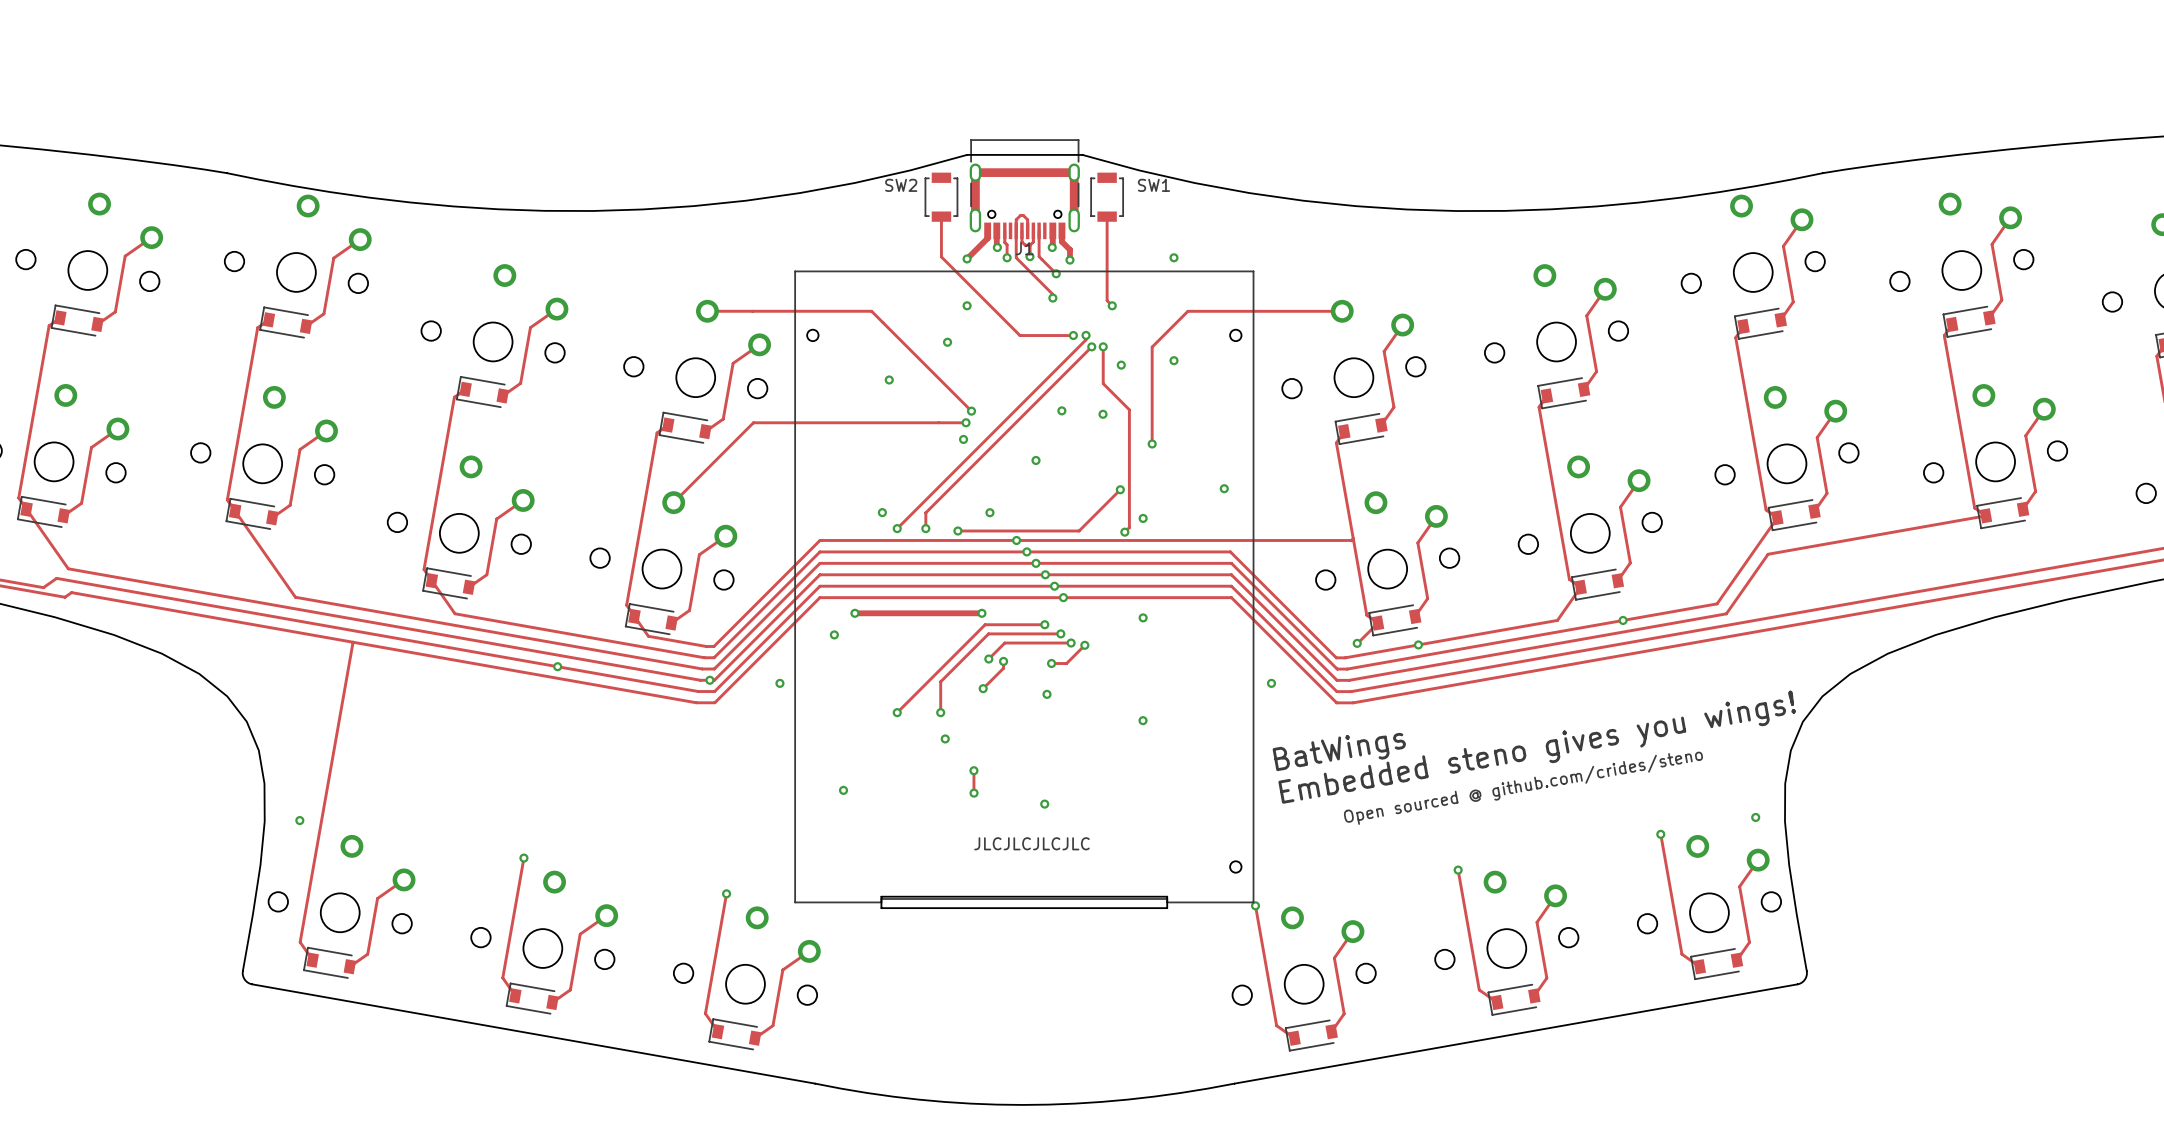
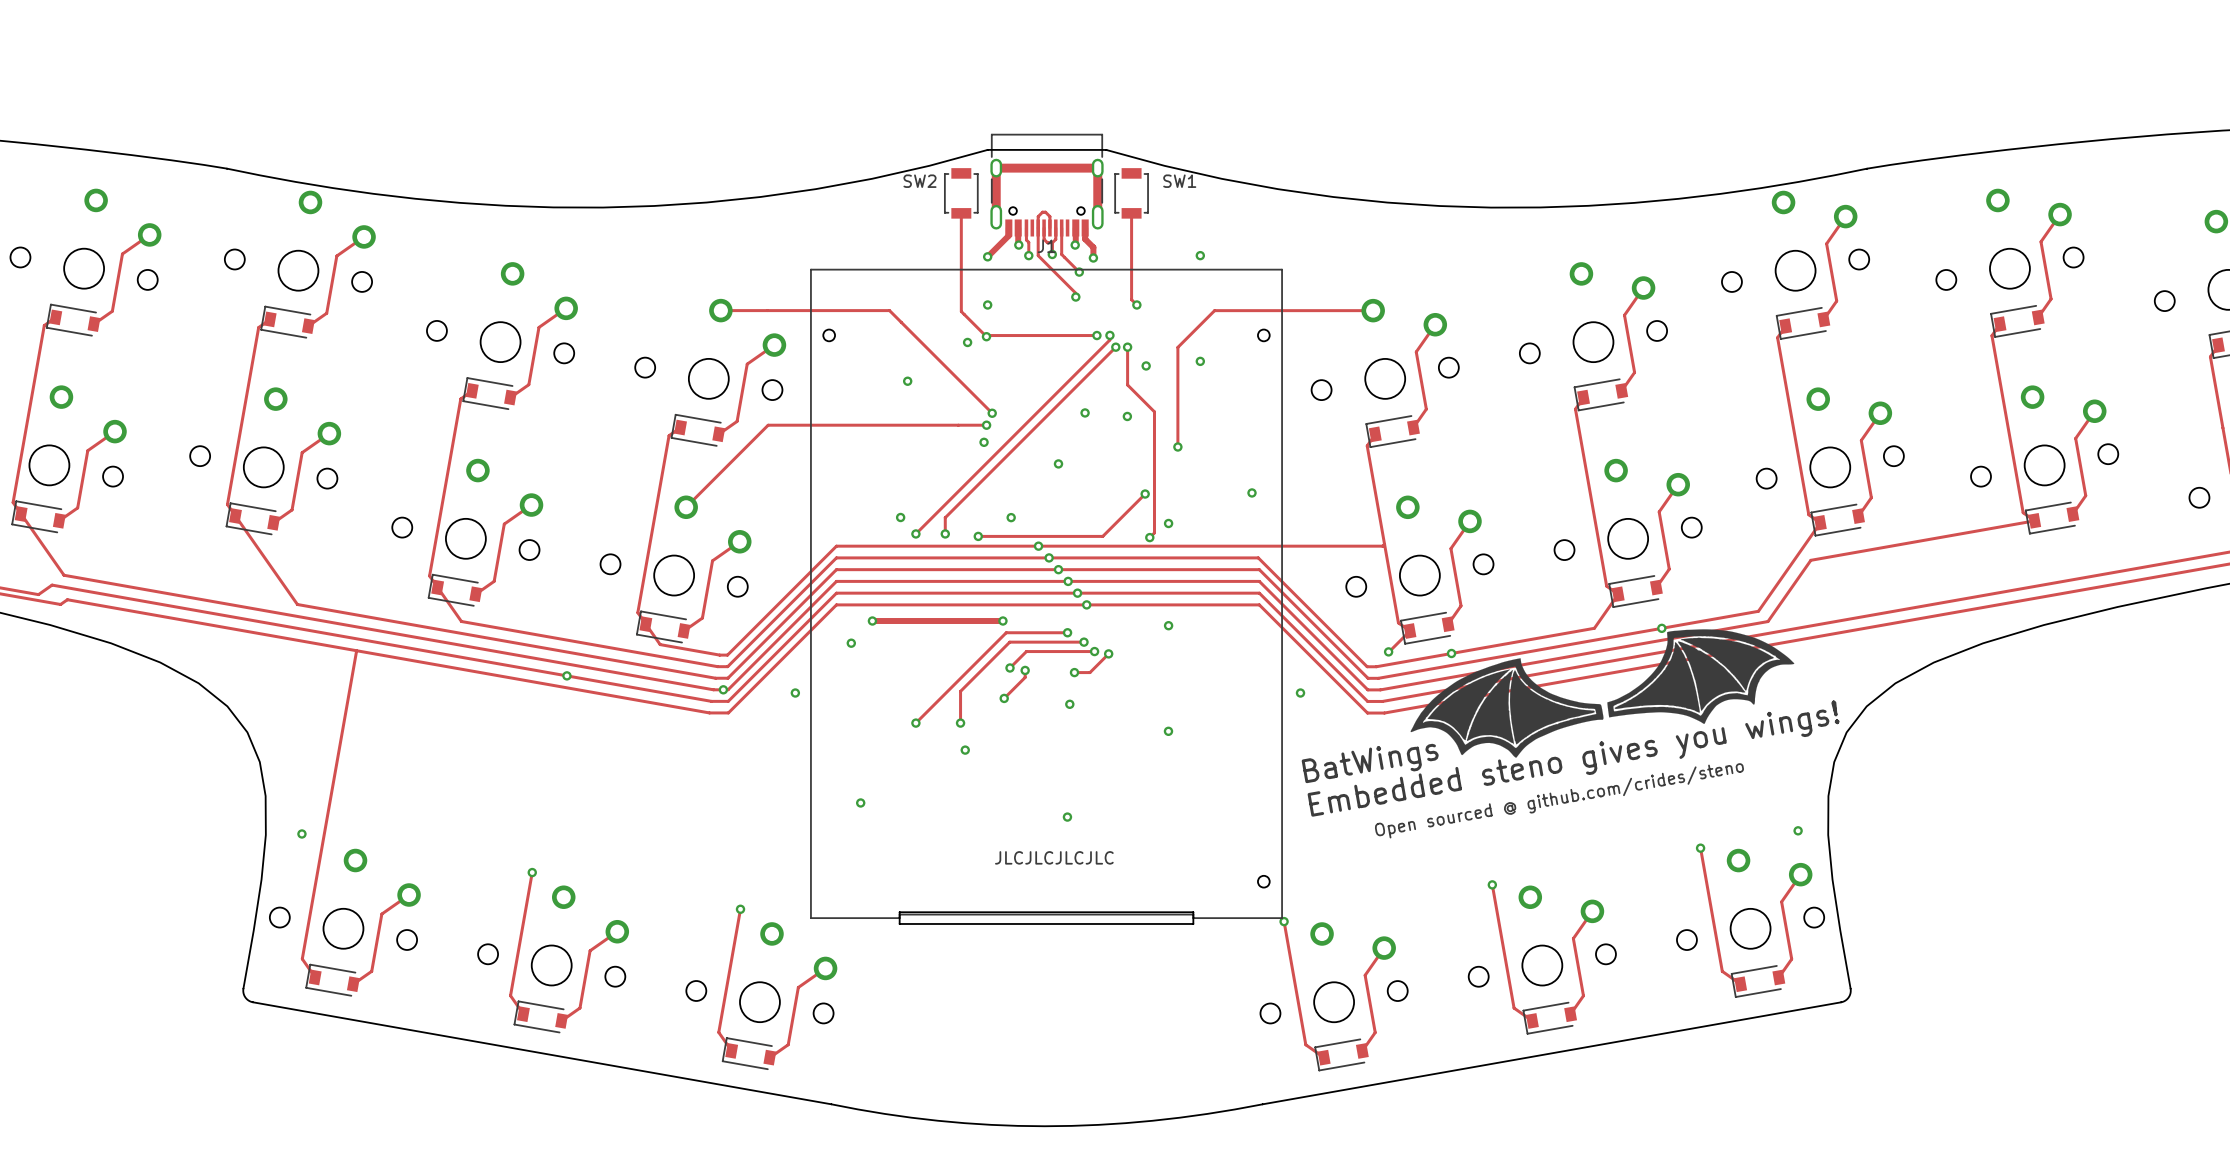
track: (941, 256) (1020, 335) -> (961, 254) (961, 311) (986, 336) (1042, 335)
via: none -> (986, 336)
drawing: none -> [1410, 629, 1795, 758]
track: (973, 770) (973, 793) -> none
via: (973, 770) -> none
via: (974, 793) -> none

